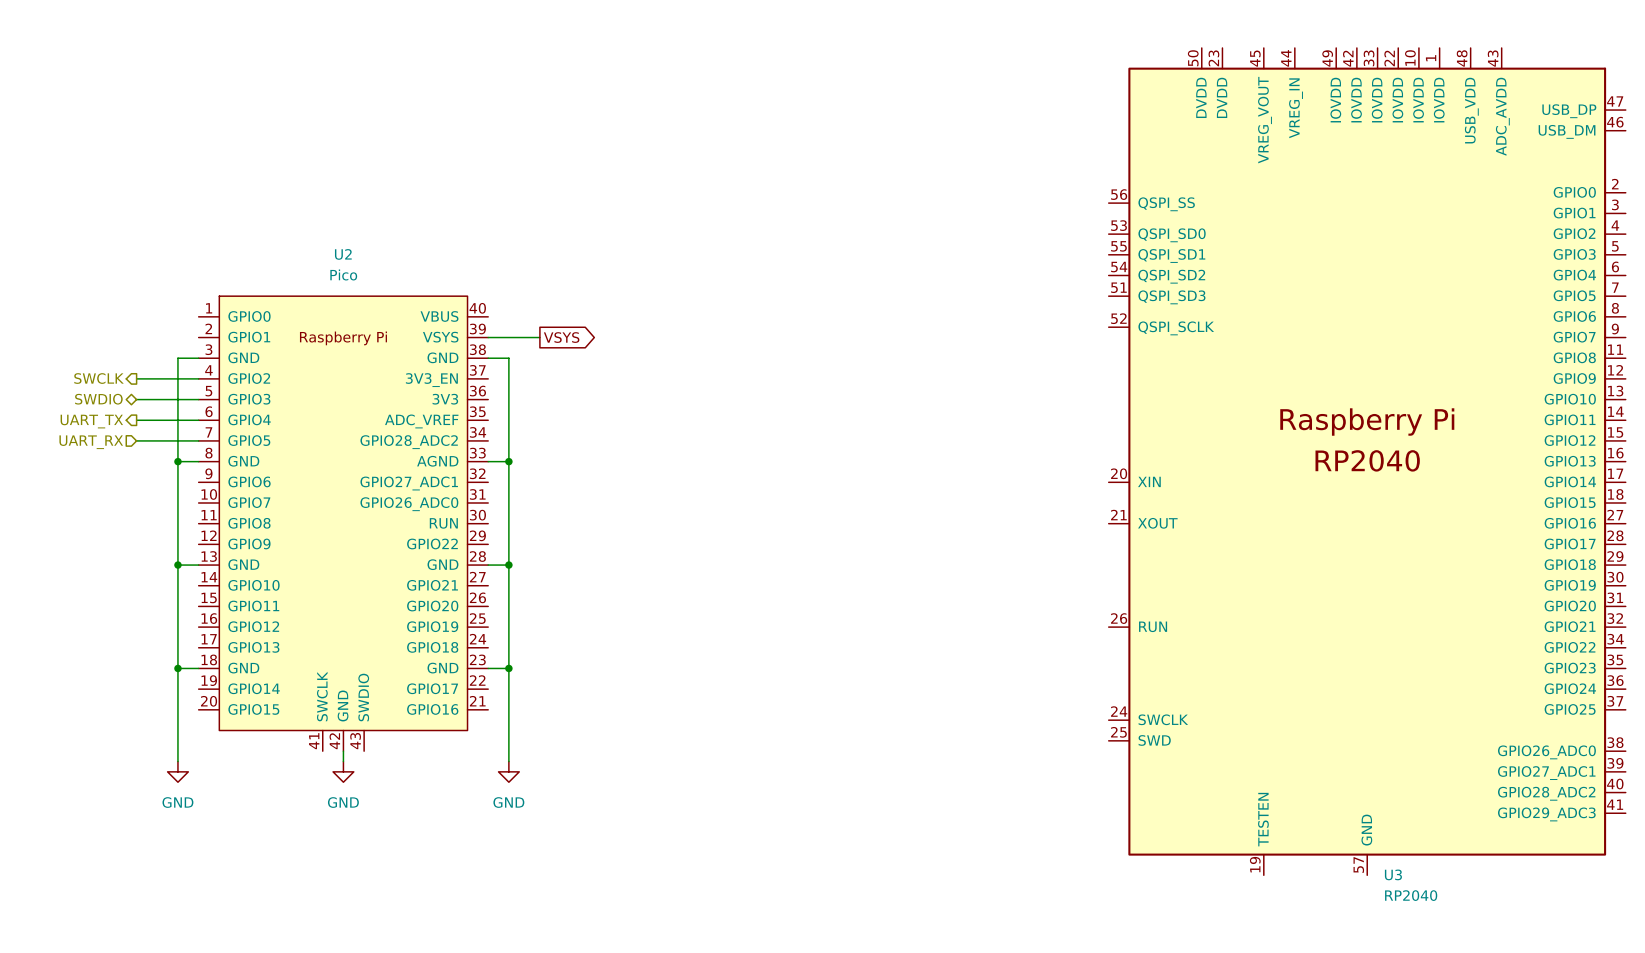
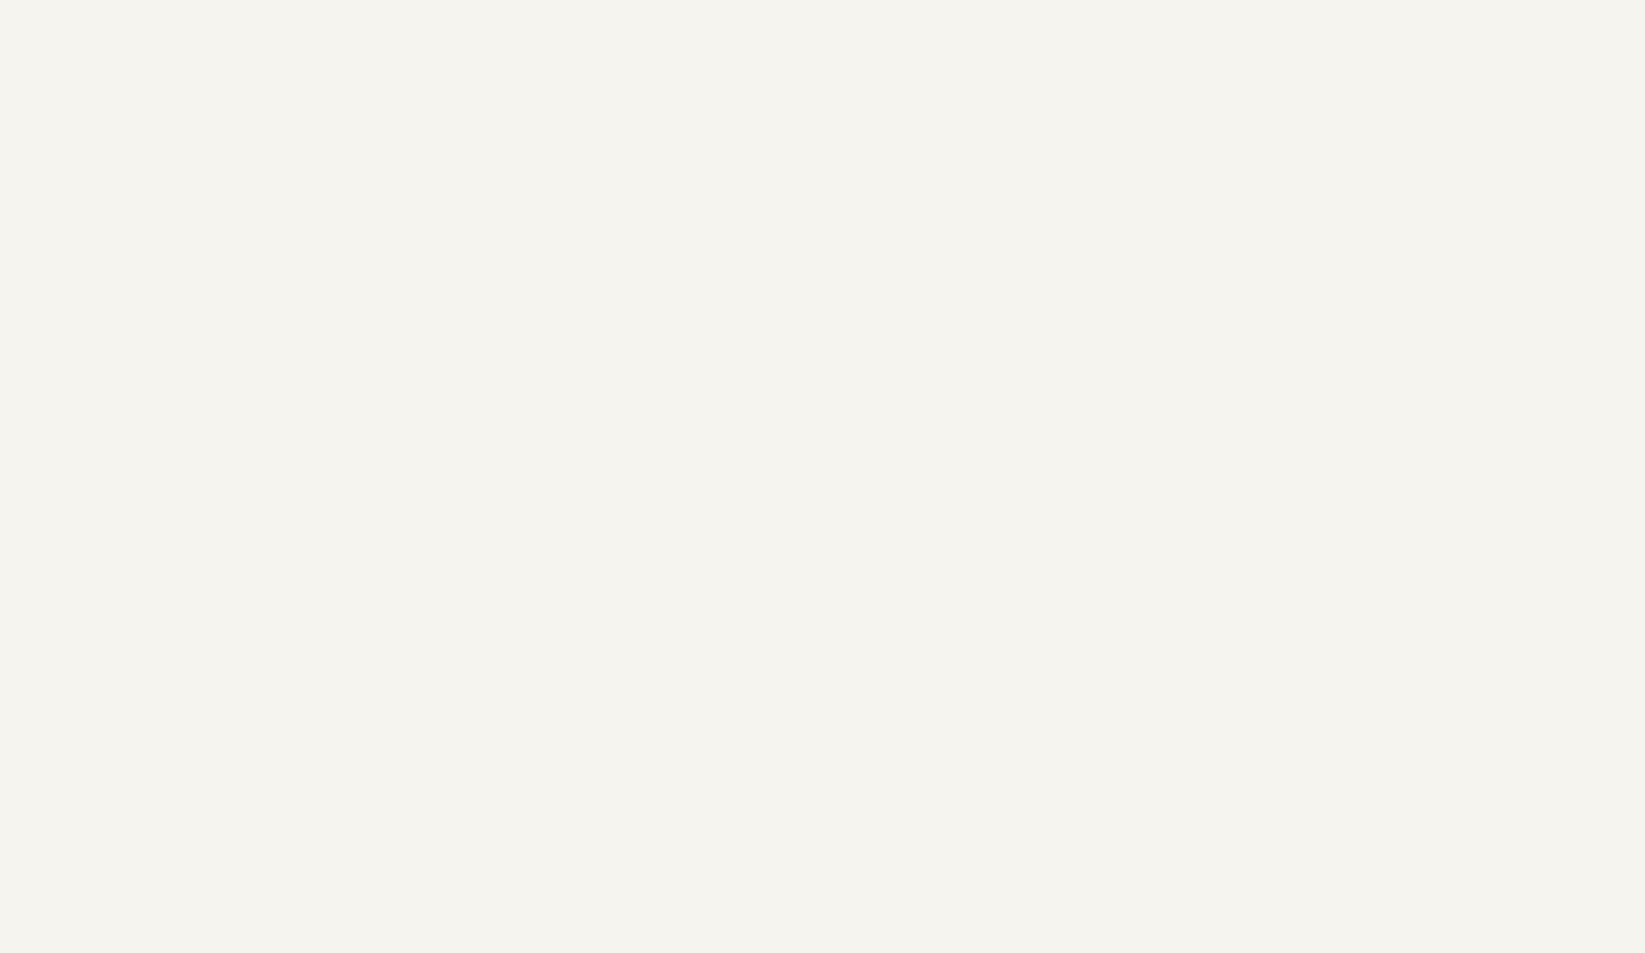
wire: (488, 337) (539, 337) -> none
global label: VSYS (561, 337) -> none
wire: (198, 358) (177, 358) (177, 761) -> none
wire: (488, 358) (508, 358) (508, 761) -> none
hierarchical label: SWCLK (99, 378) -> none
wire: (136, 378) (198, 378) -> none
hierarchical label: SWDIO (98, 399) -> none
wire: (136, 399) (198, 399) -> none
wire: (136, 420) (198, 420) -> none
hierarchical label: UART_TX (91, 421) -> none
wire: (136, 440) (198, 440) -> none
hierarchical label: UART_RX (91, 442) -> none
wire: (177, 461) (198, 461) -> none
junction: (177, 461) -> none
wire: (488, 461) (508, 461) -> none
junction: (508, 461) -> none
U3: RP2040 (1367, 461) -> none
U2: Pico (343, 523) -> none
wire: (177, 565) (198, 565) -> none
junction: (177, 565) -> none
wire: (488, 565) (508, 565) -> none
junction: (508, 565) -> none
wire: (177, 668) (198, 668) -> none
junction: (177, 668) -> none
wire: (488, 668) (508, 668) -> none
junction: (508, 668) -> none
wire: (343, 751) (343, 761) -> none
power symbol: GND (177, 771) -> none
power symbol: GND (343, 771) -> none
power symbol: GND (508, 771) -> none

